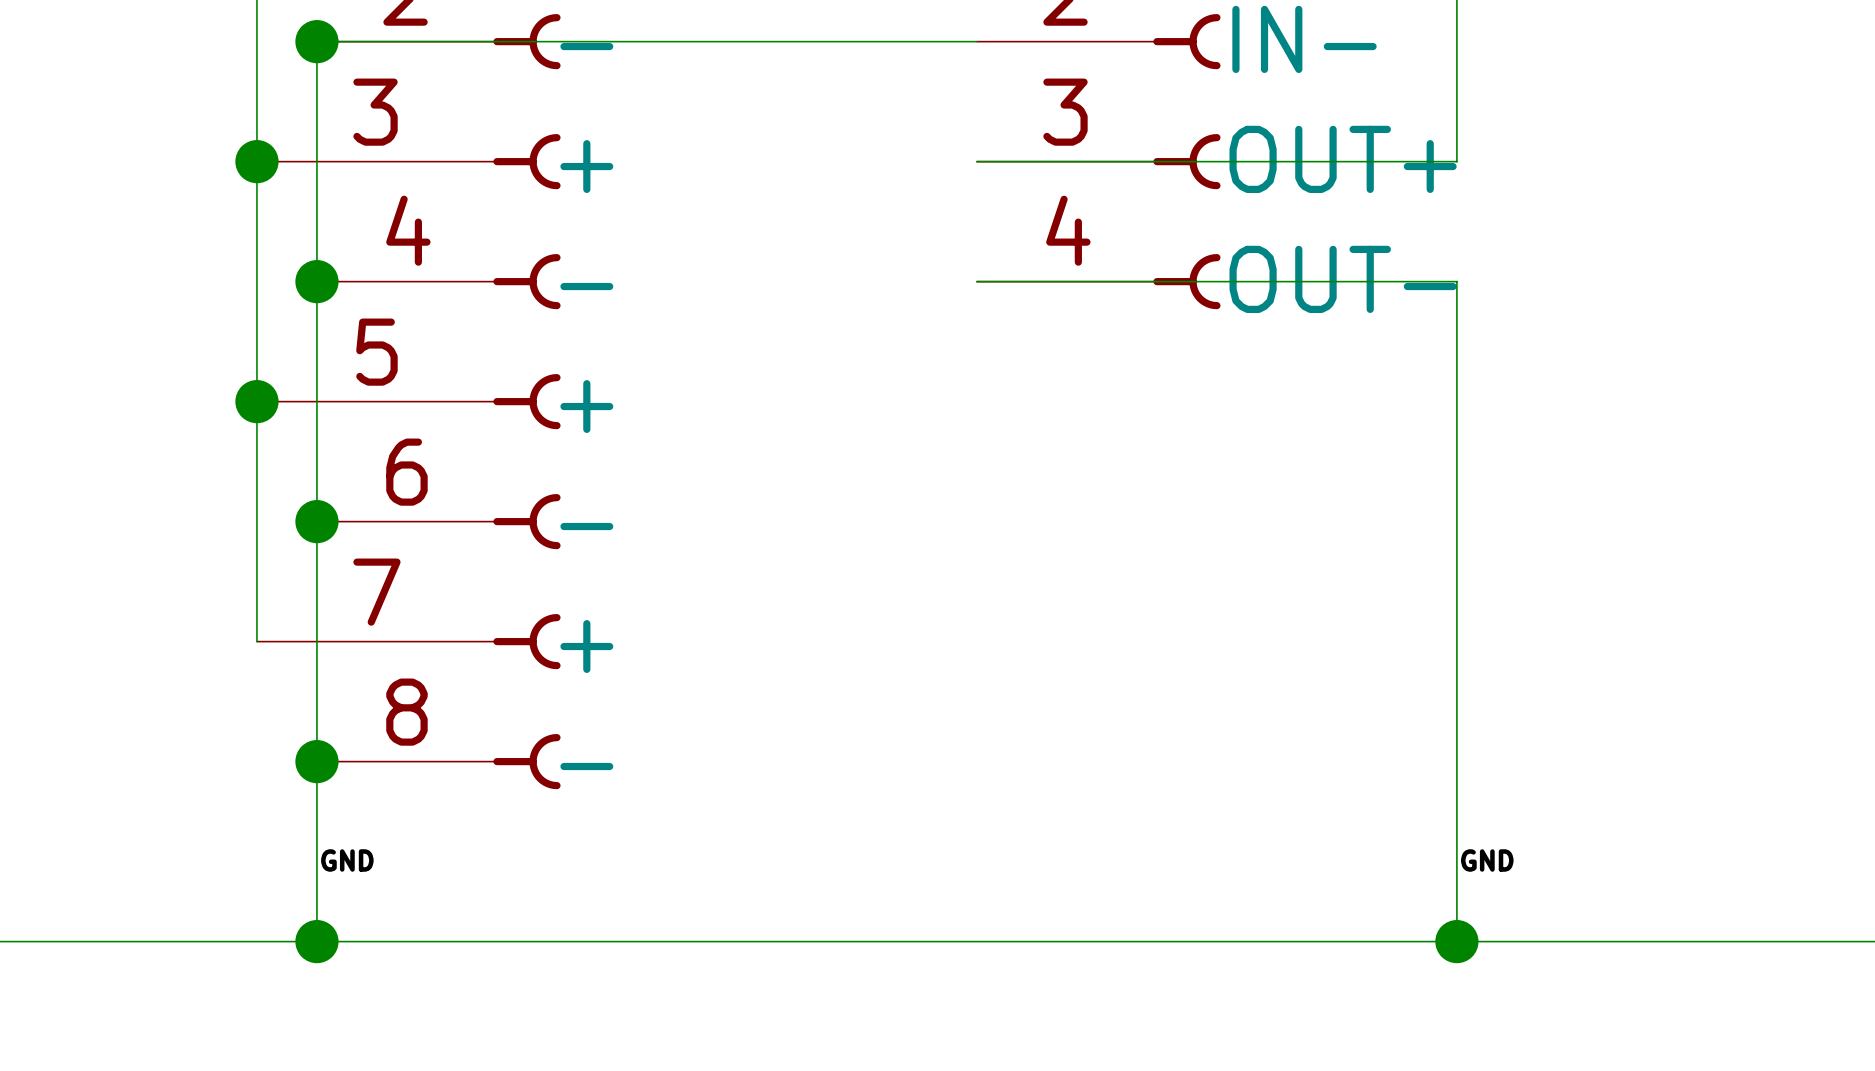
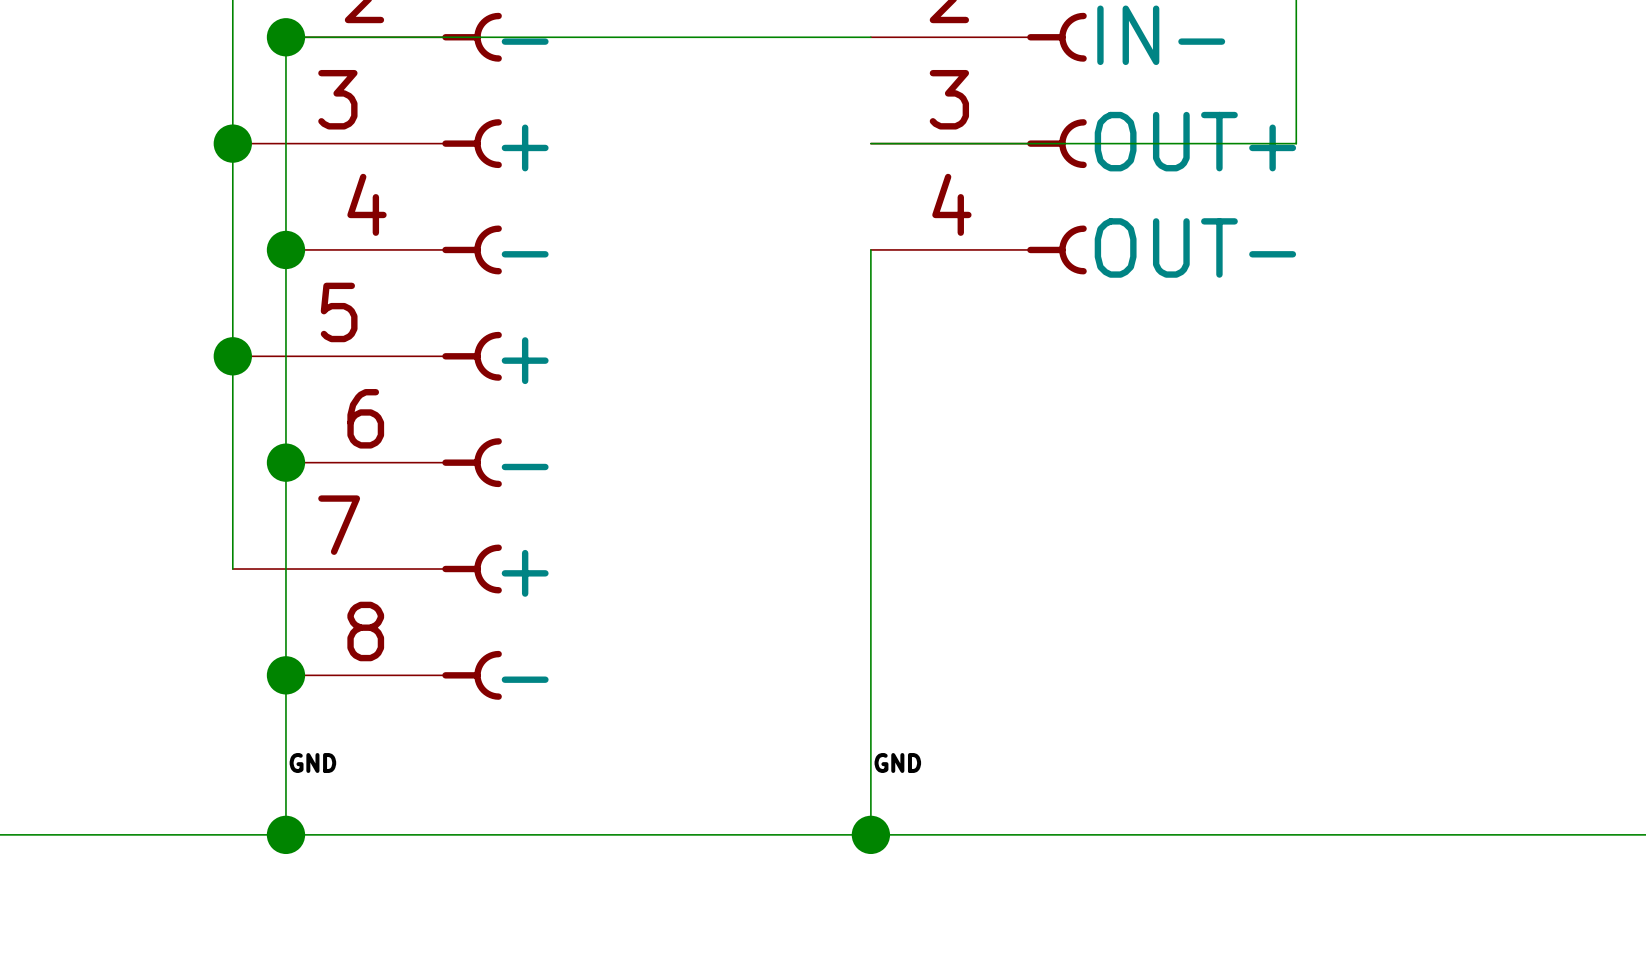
wire: (976, 281) (1456, 281) (1456, 941) -> (870, 249) (870, 834)
label position: GND (1487, 860) -> GND (897, 763)
junction: none -> (870, 834)
junction: (1456, 941) -> none

